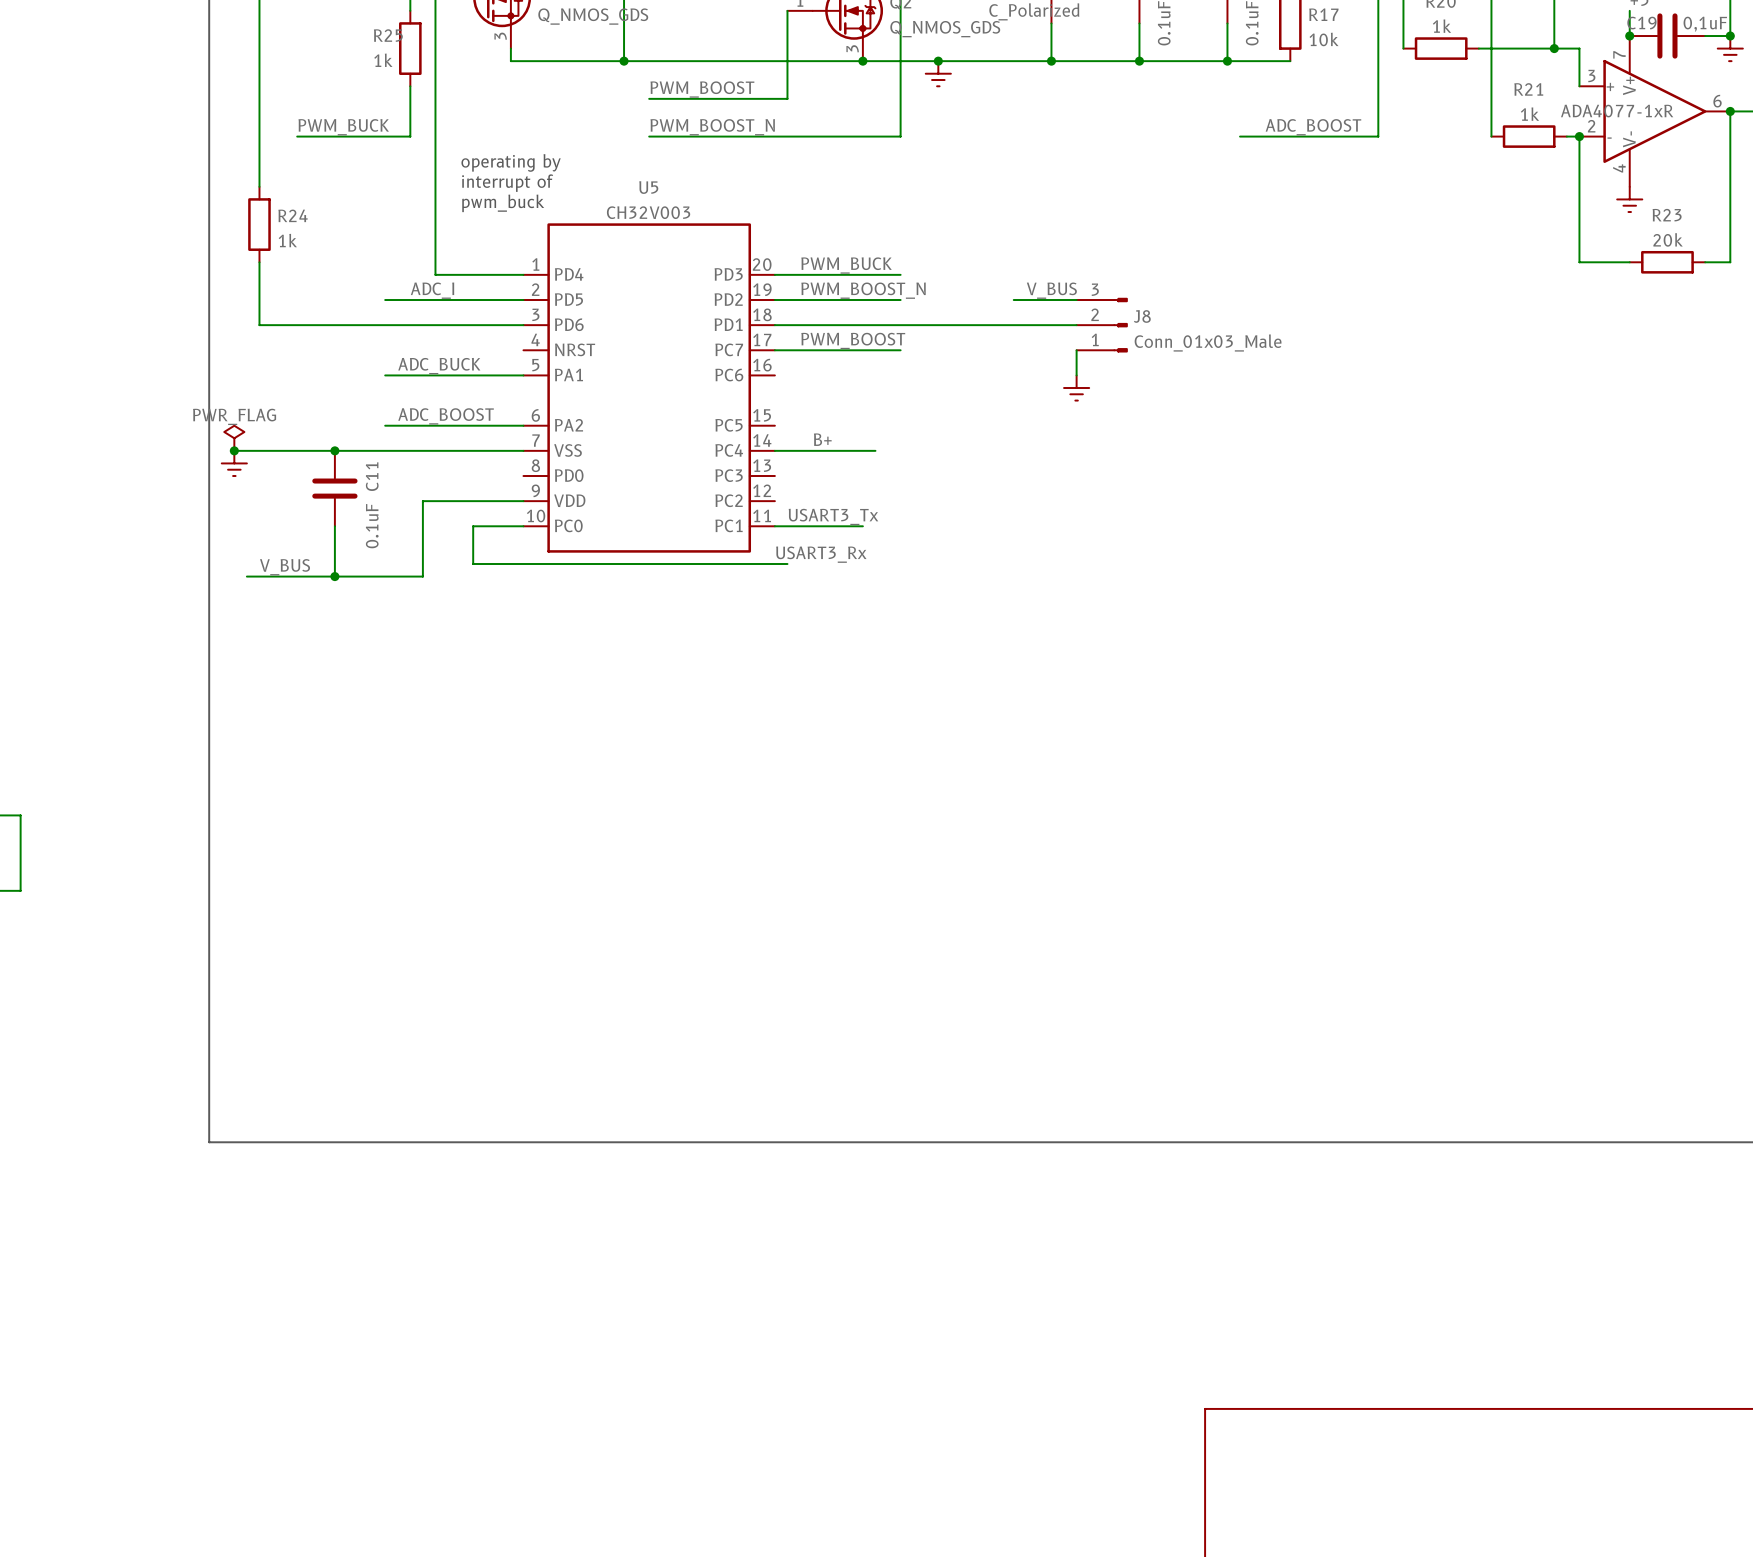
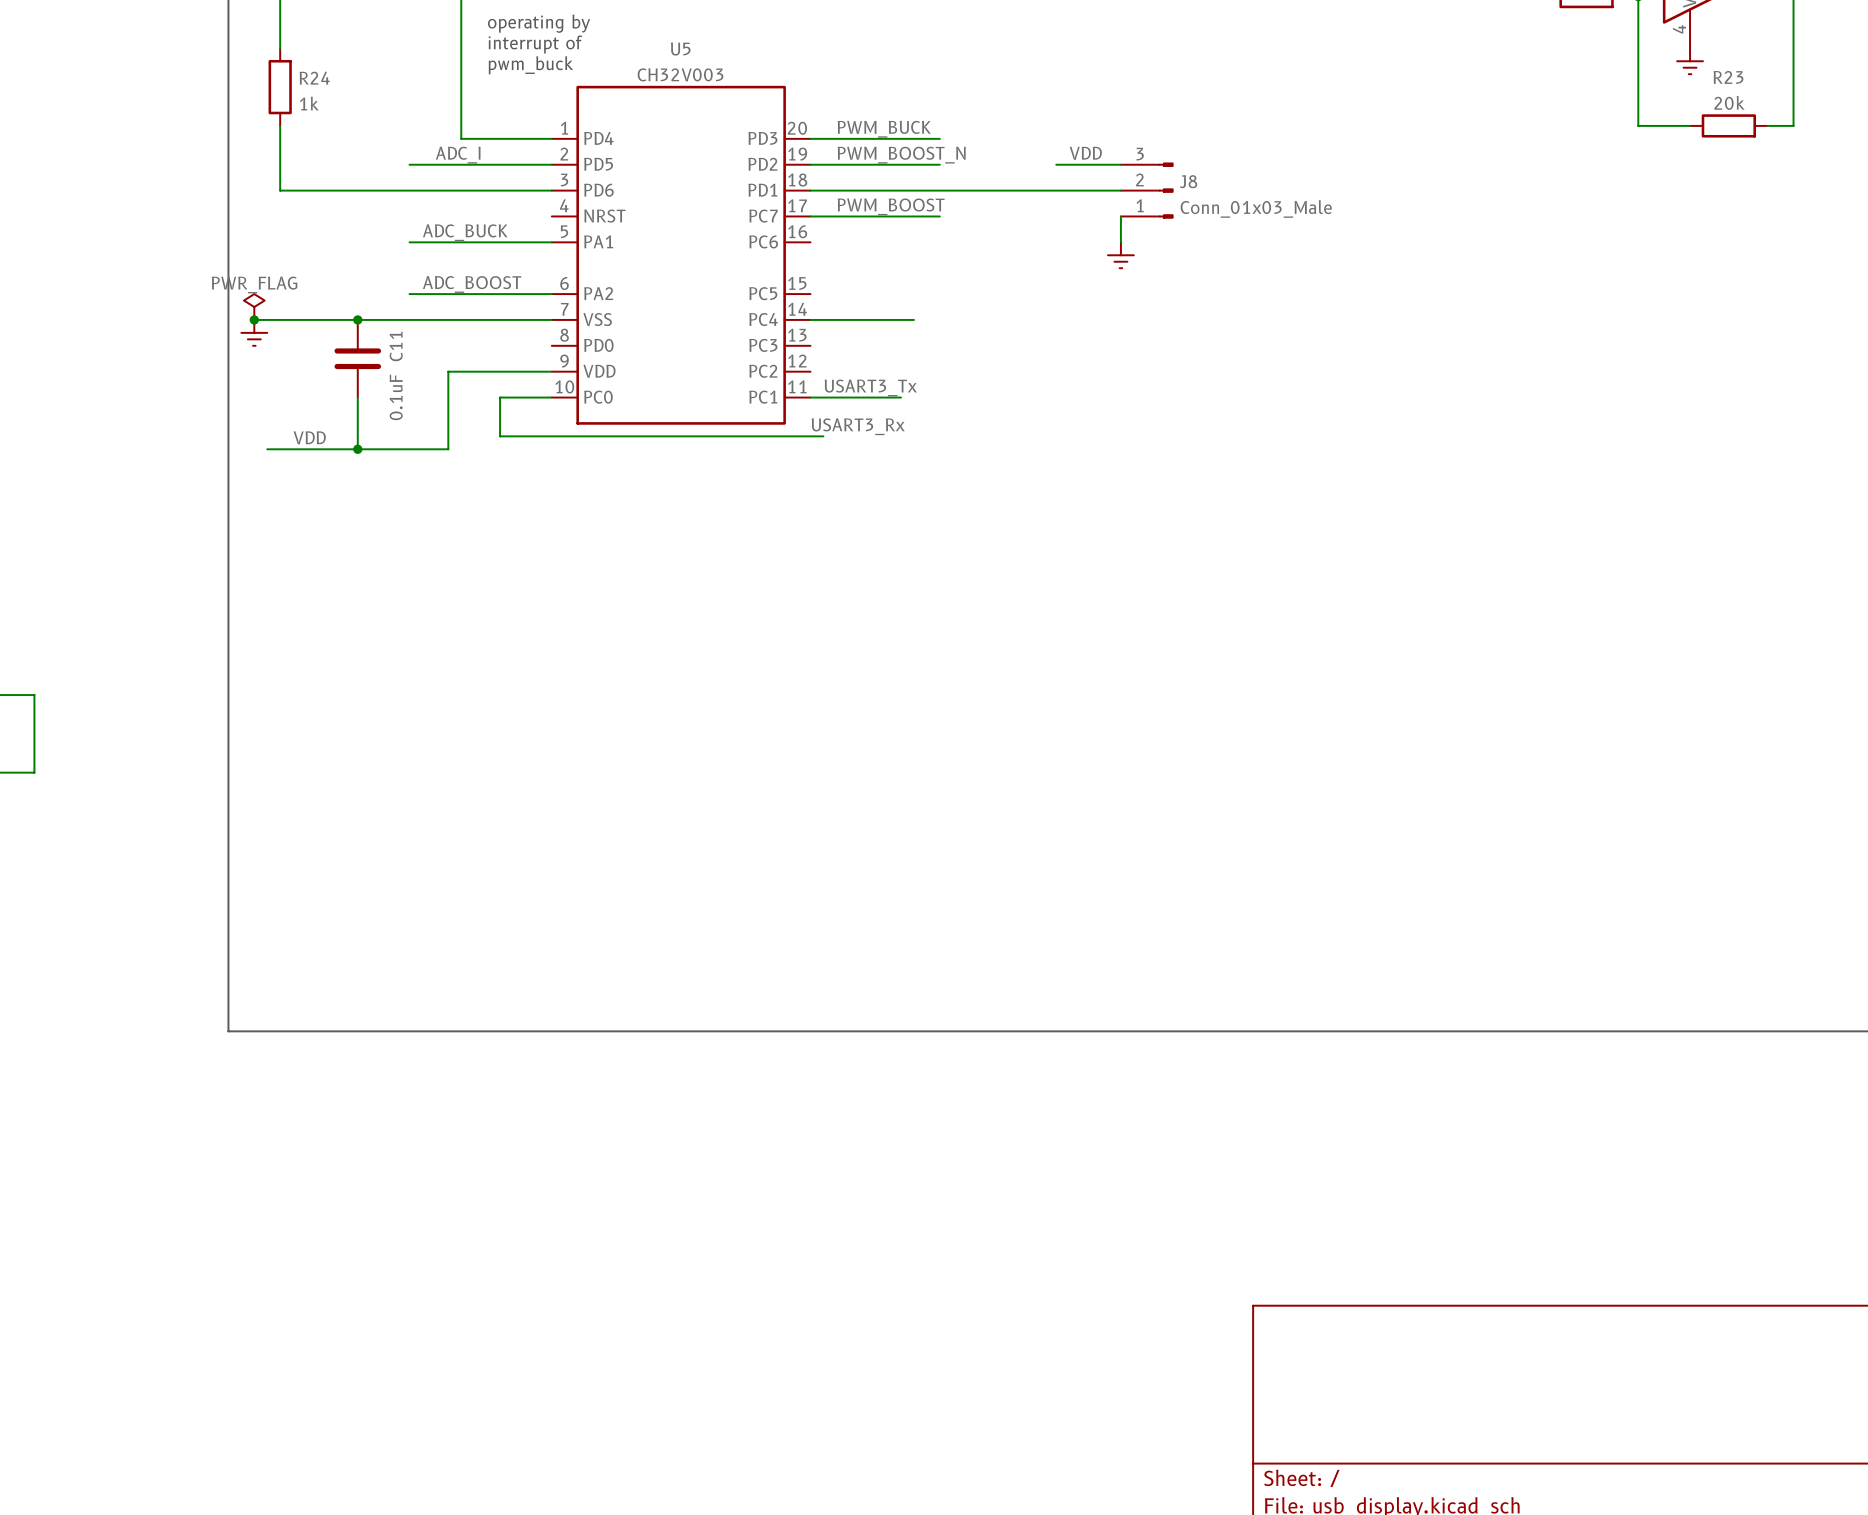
label: V_BUS (1051, 290) -> VDD (1085, 153)
label: B+ (822, 439) -> none
label: none -> VDD (309, 437)
label: V_BUS (285, 567) -> none

